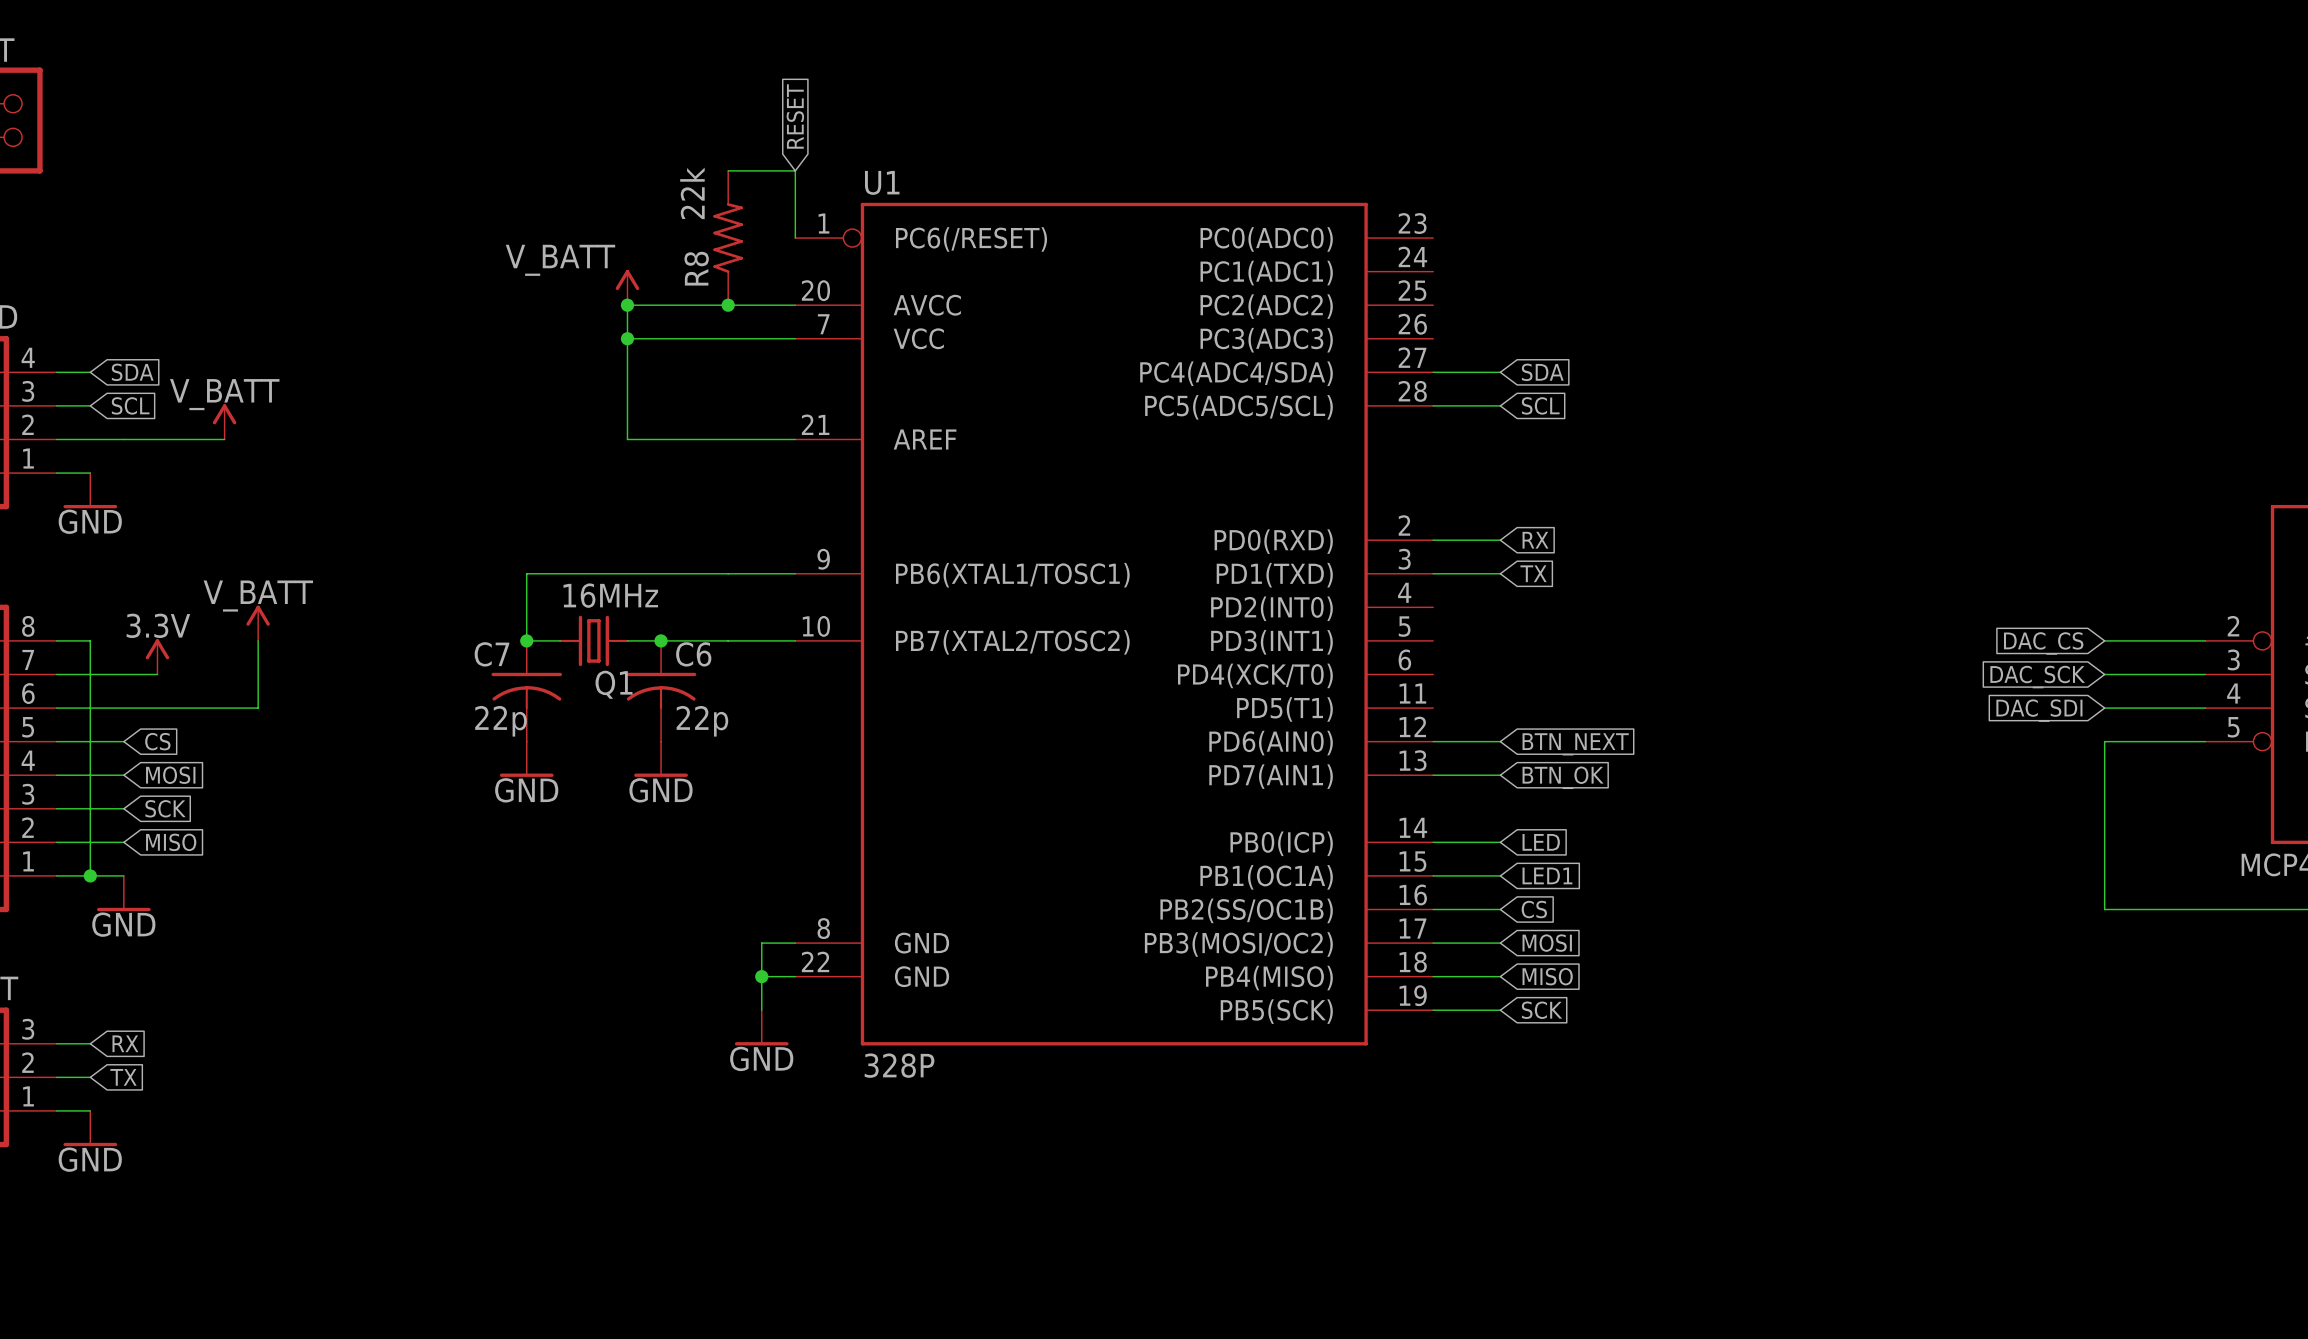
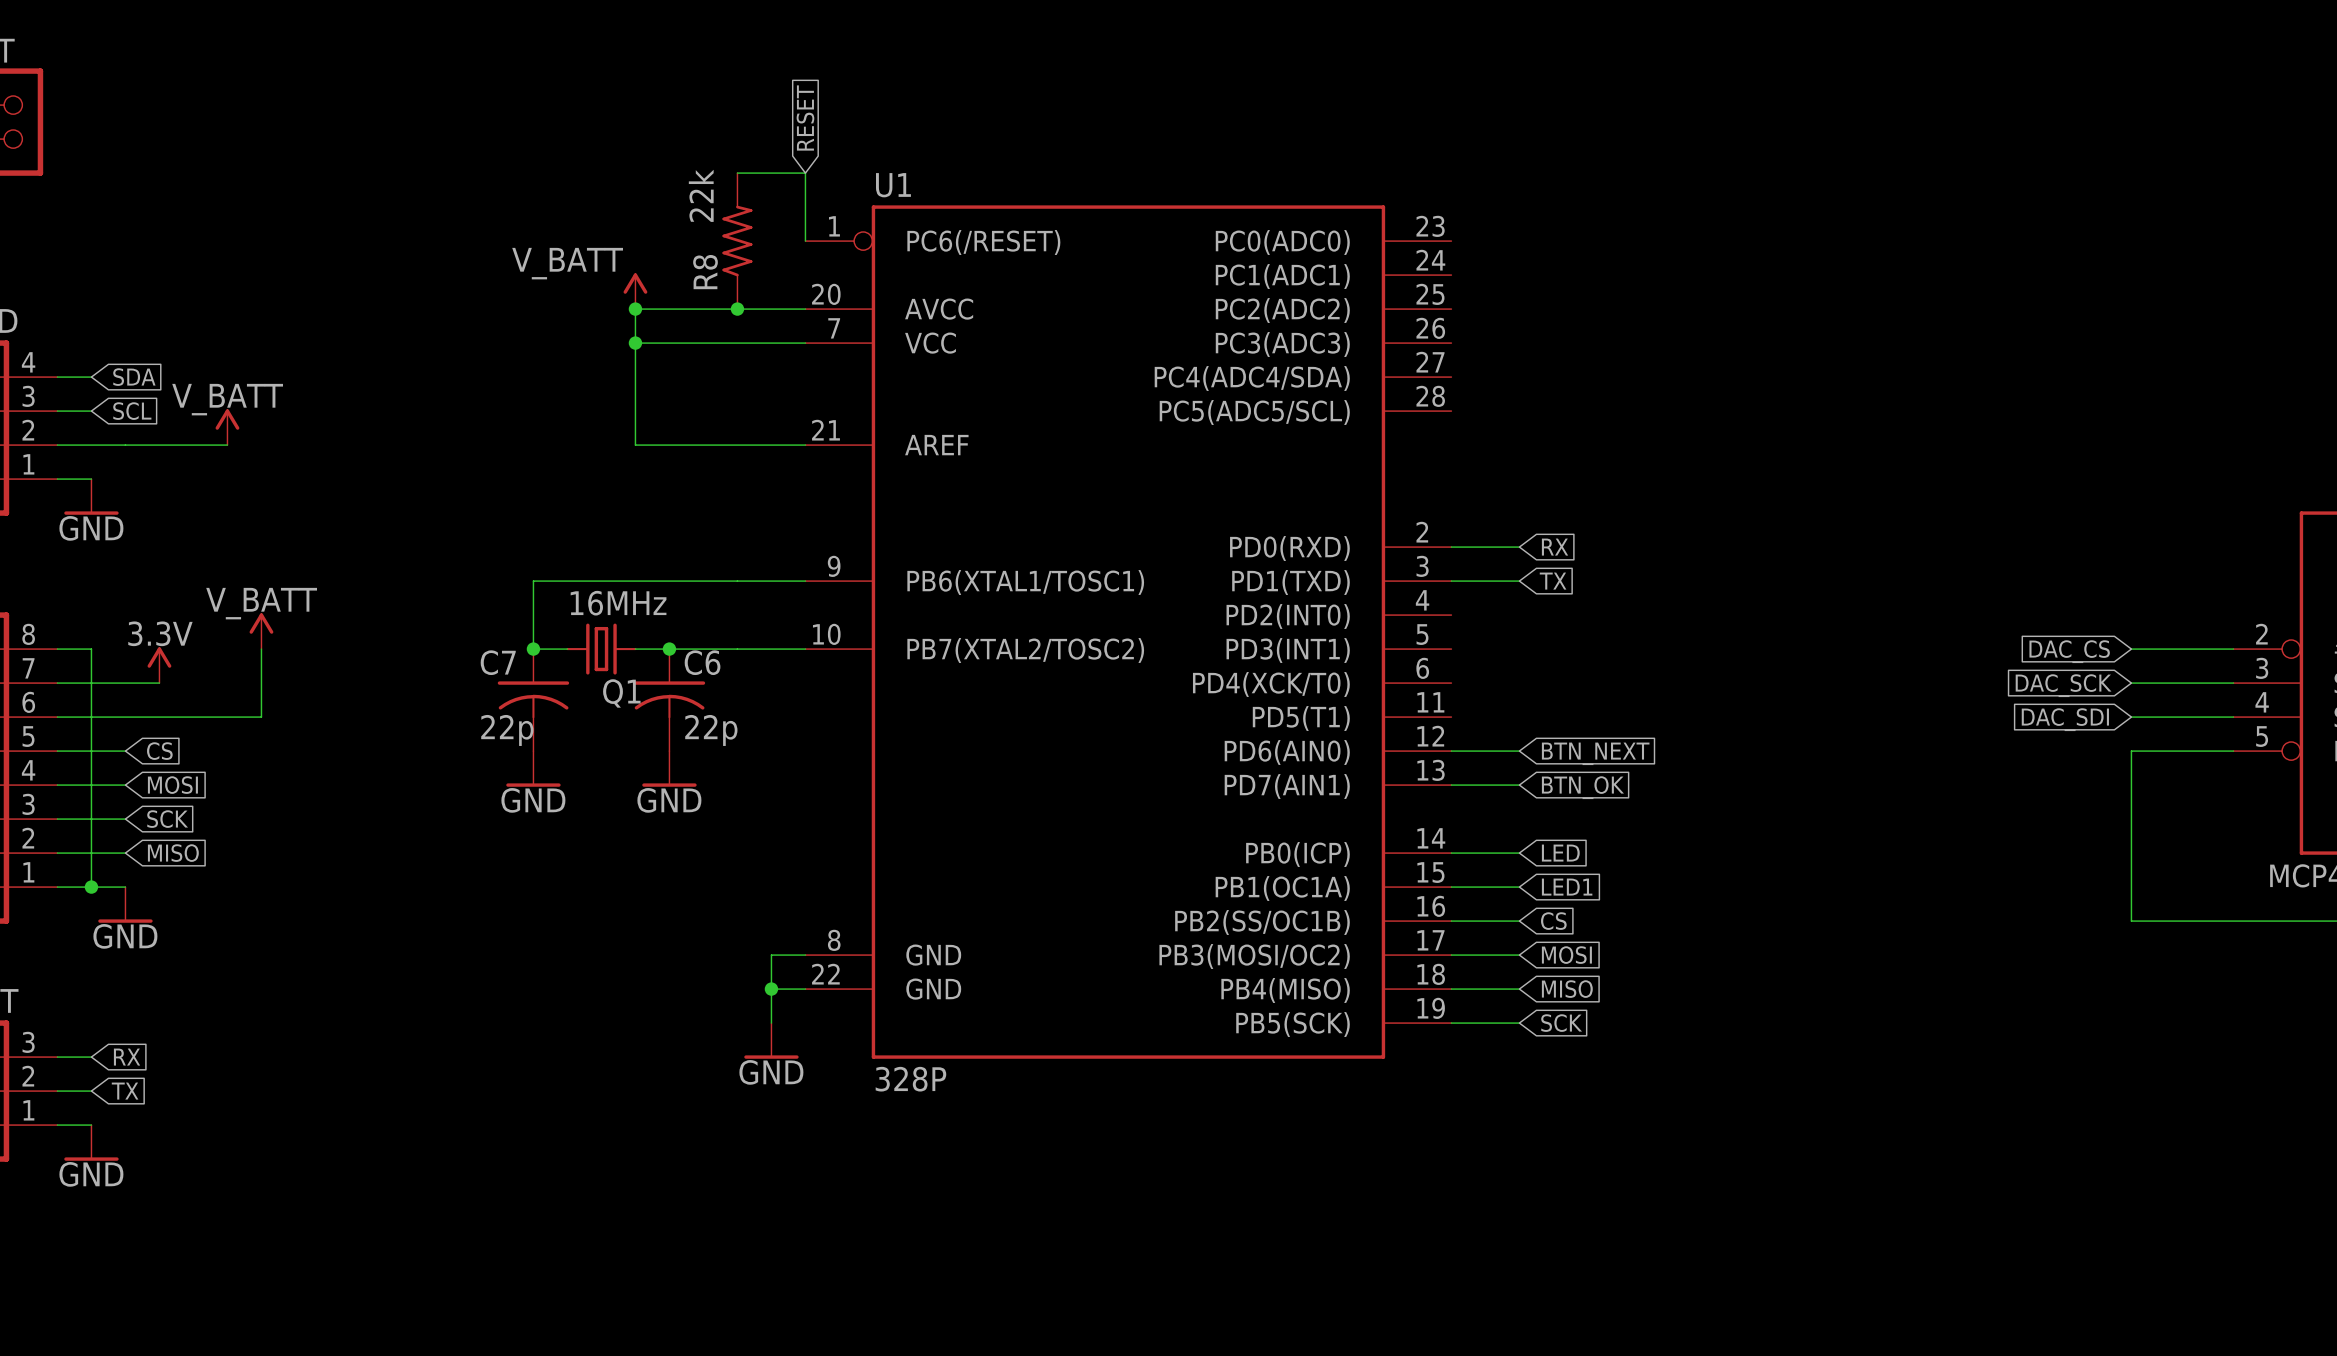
wire: (1433, 372) (1500, 372) -> none
global label: SDA (1542, 372) -> none
wire: (1433, 405) (1500, 405) -> none
global label: SCL (1540, 405) -> none

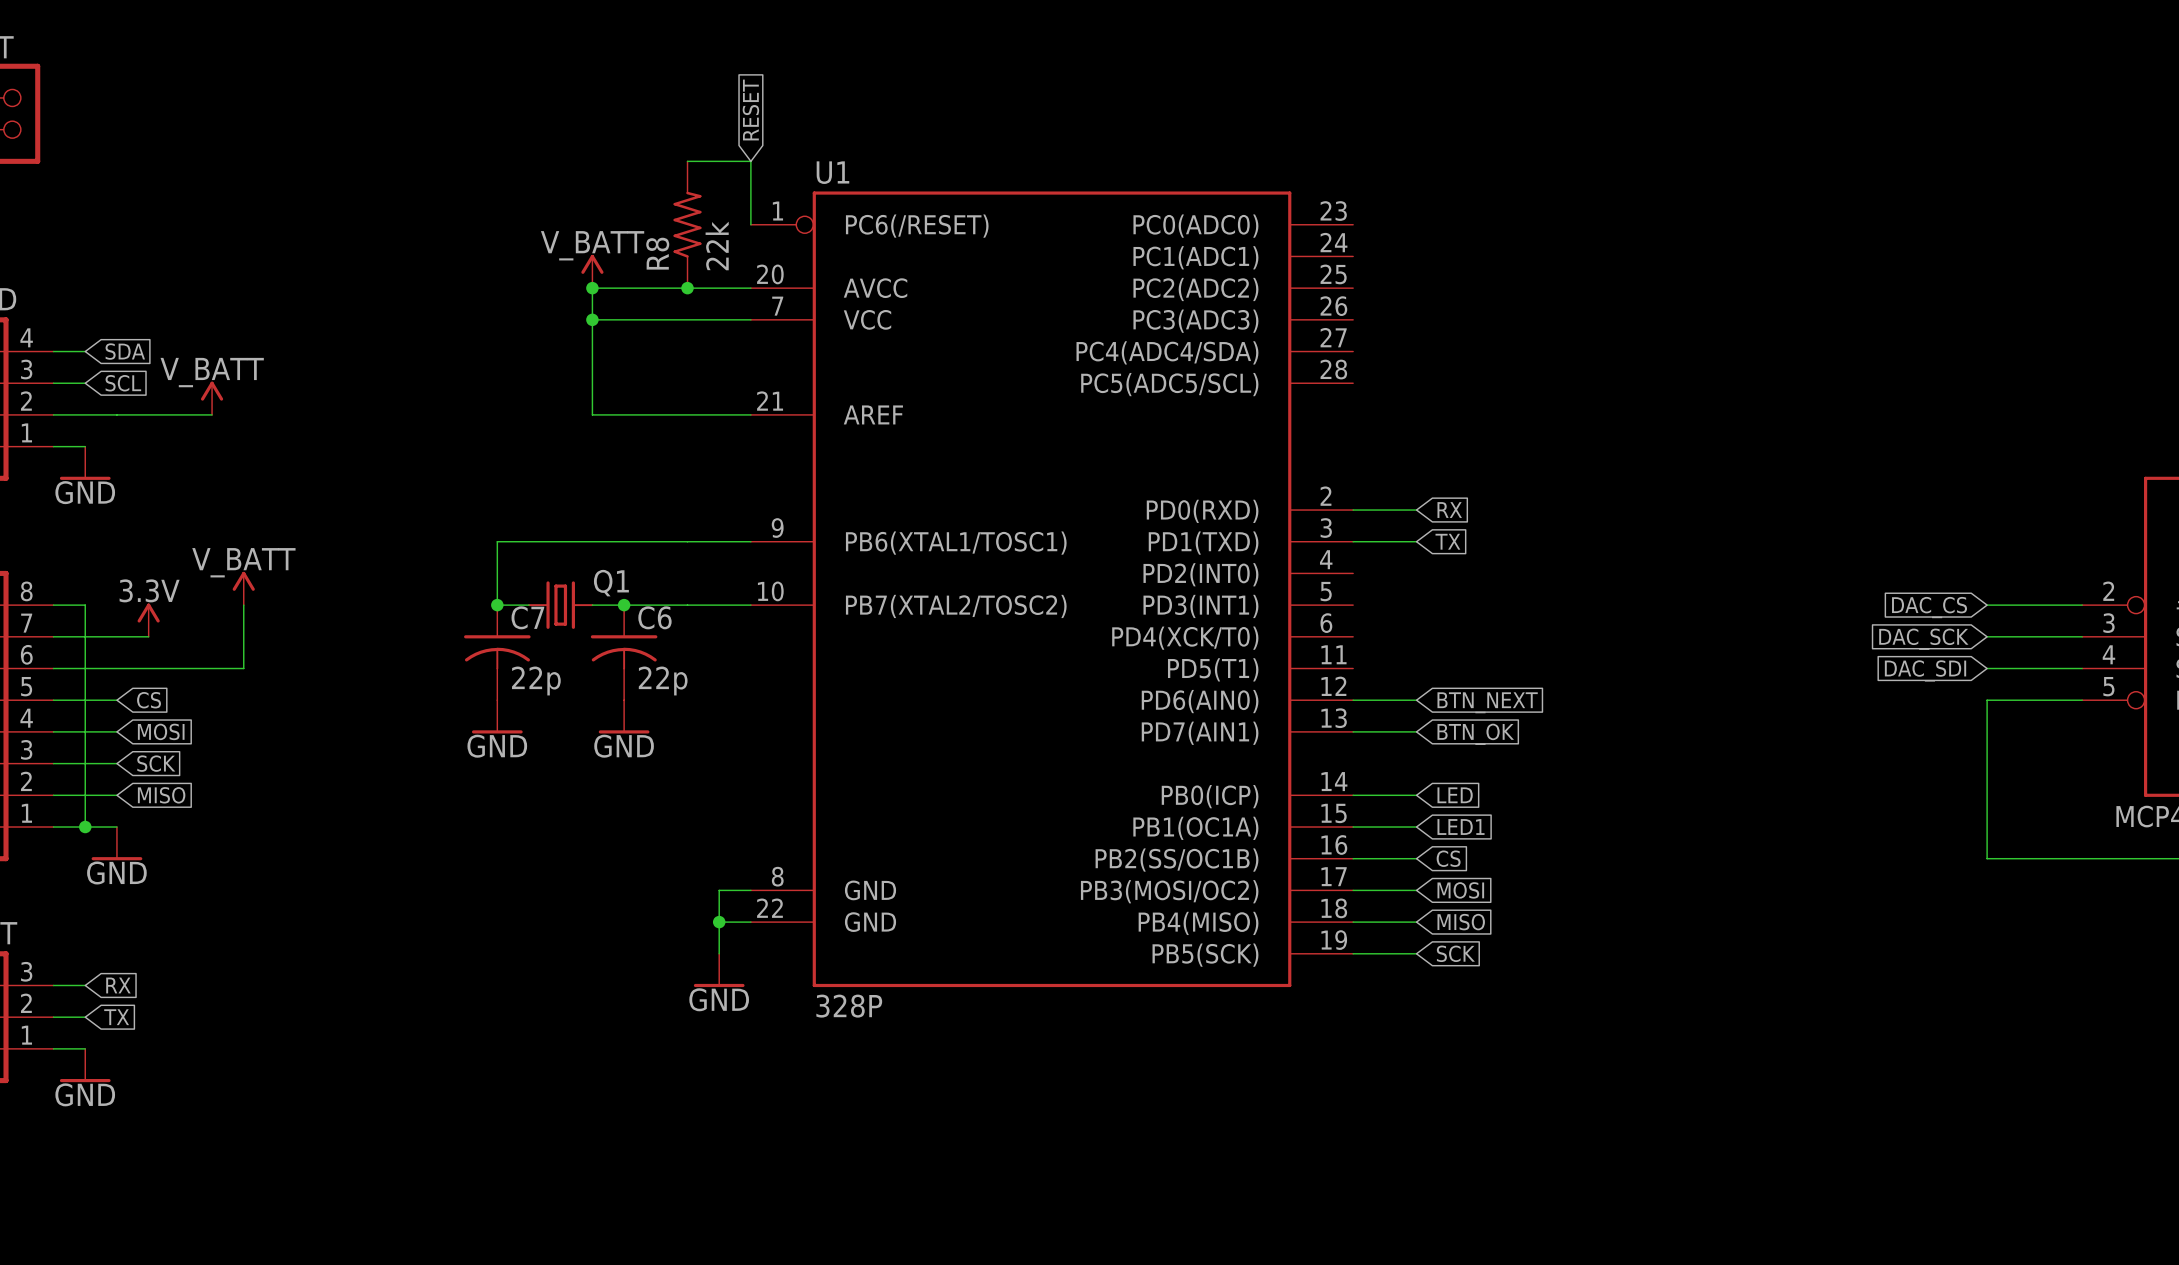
R8 value position: 22k (701, 195) -> 22k (717, 245)
power symbol text position: V_BATT (567, 263) -> V_BATT (592, 245)
Q1 value: 16MHz (618, 603) -> none
C7 name position: C7 (498, 662) -> C7 (527, 617)
Q1 name position: Q1 (621, 693) -> Q1 (611, 583)
C7 value position: 22p (507, 730) -> 22p (536, 680)

